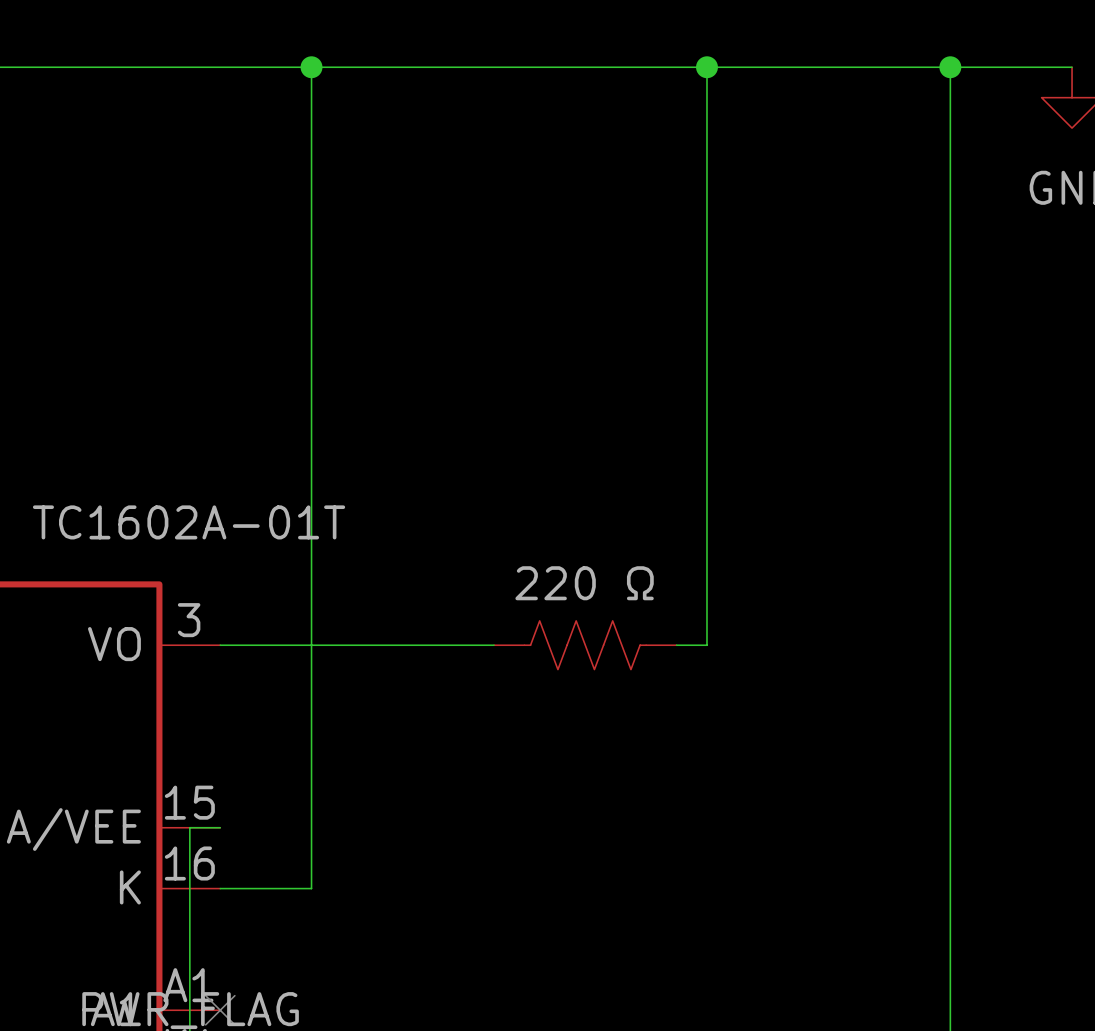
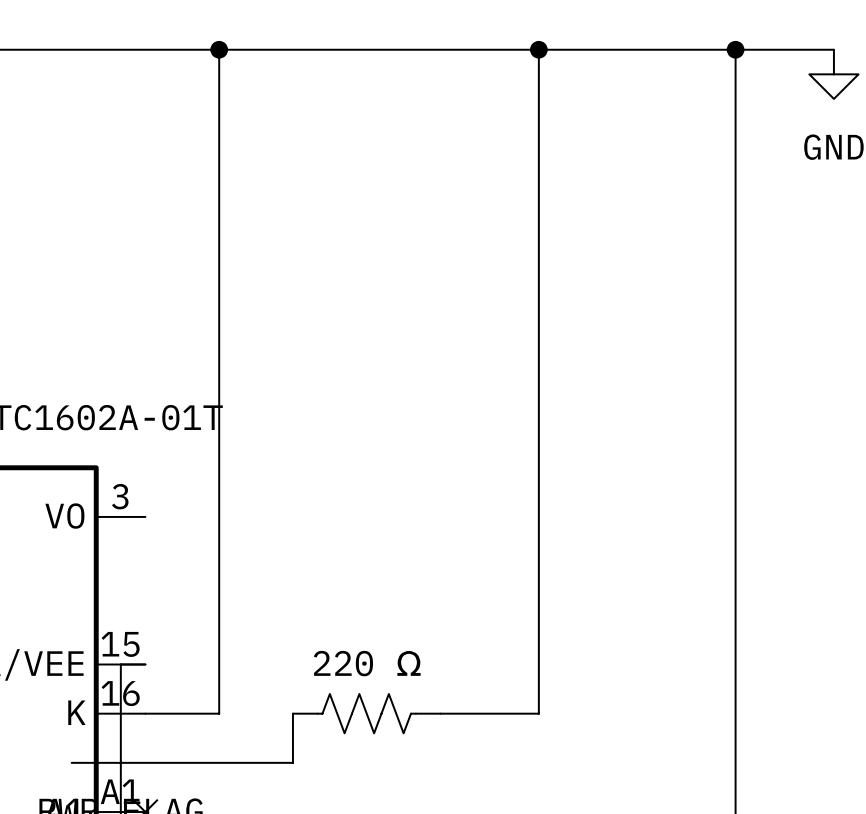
wire: (220, 645) (494, 645) -> none
part: 220 Ω (585, 645) -> none
wire: (676, 645) (706, 645) -> (440, 713) (538, 713) (538, 516)
wire: none -> (292, 713) (292, 762) (71, 762)
part: none -> 220 Ω (366, 713)

